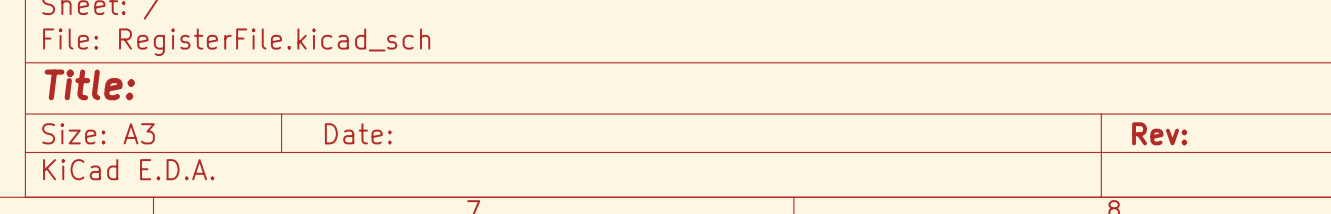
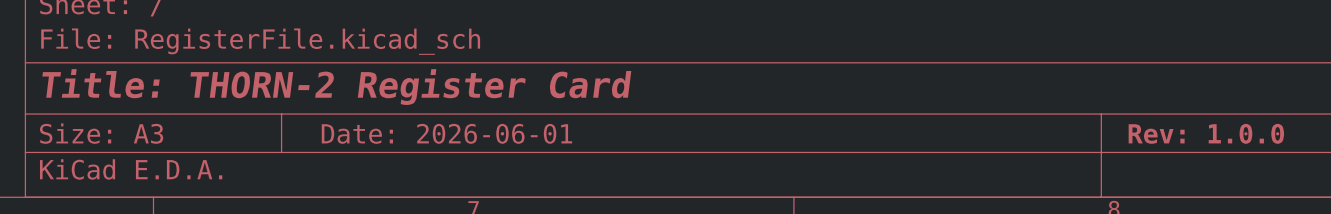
title block: Title: (89, 84) -> Title: THORN-2 Register Card (336, 87)
title block: Date: (358, 133) -> Date: 2026-06-01 (446, 133)
title block: Rev: (1159, 133) -> Rev: 1.0.0 (1206, 133)

